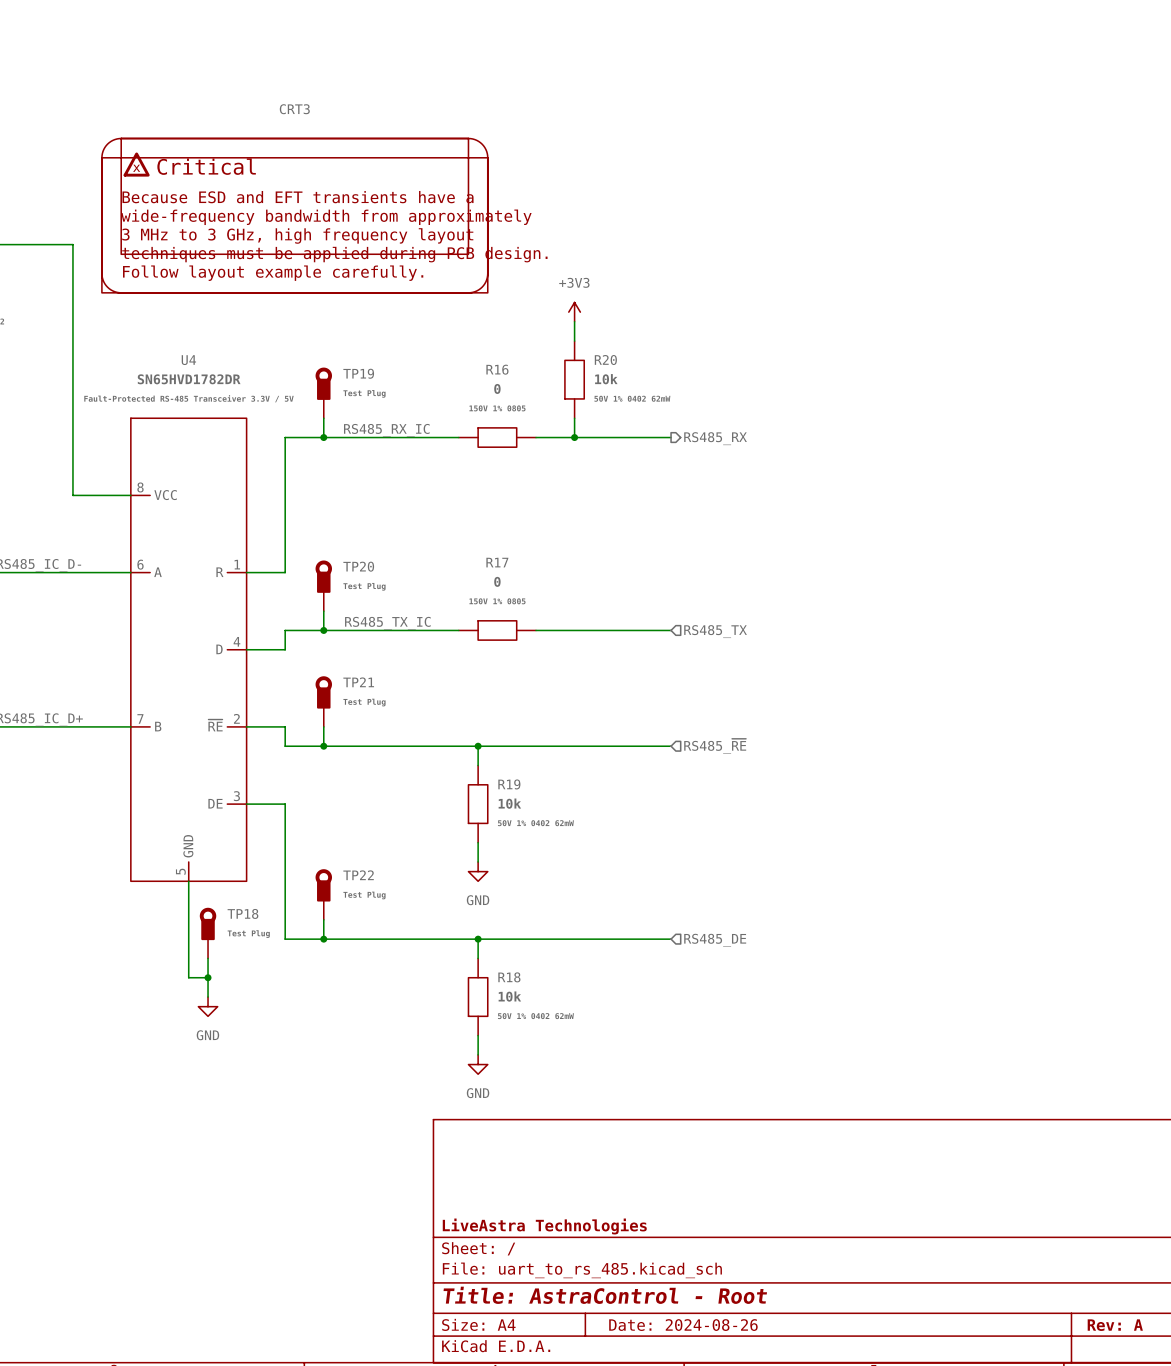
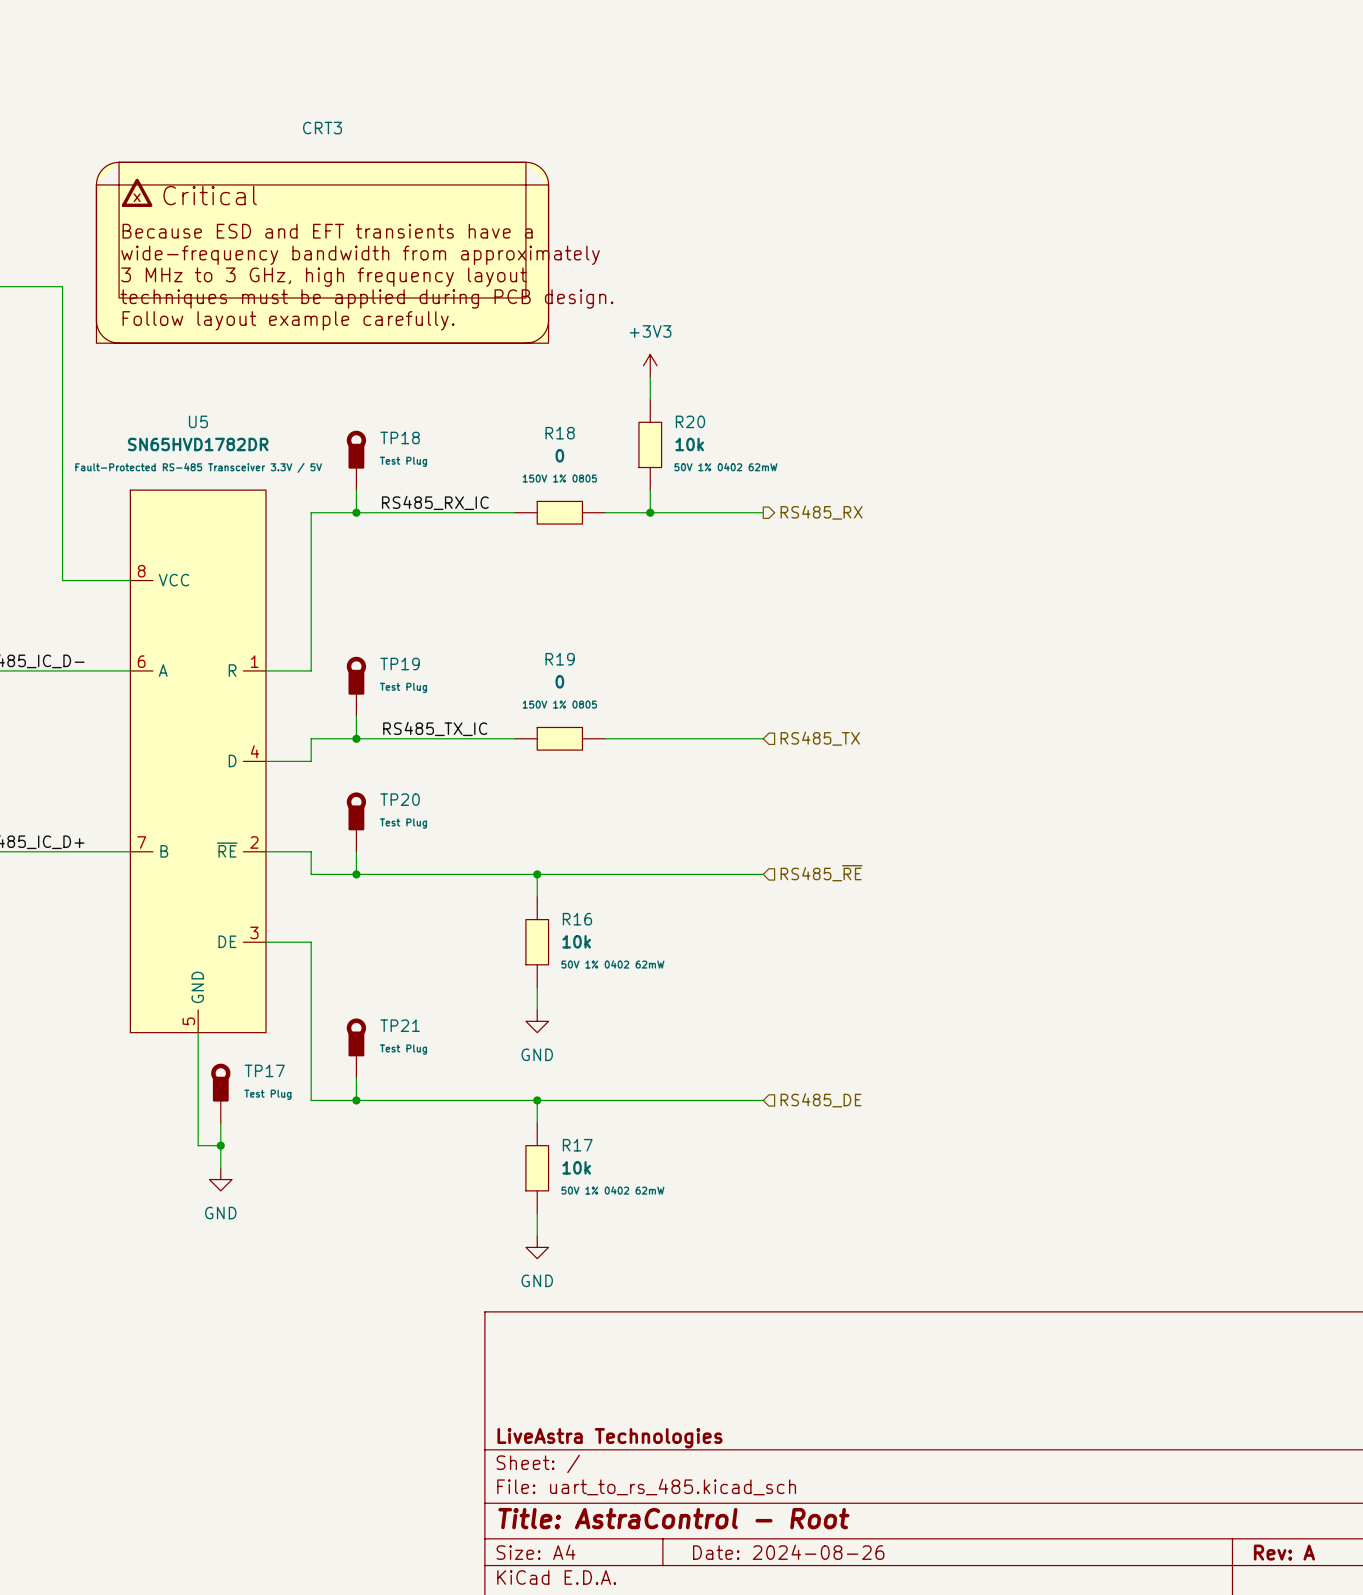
U4 name: U4 (188, 360) -> U5 (198, 421)
R16 name: R16 (497, 369) -> R18 (560, 433)
TP19 name: TP19 (358, 373) -> TP18 (400, 437)
R17 name: R17 (497, 562) -> R19 (560, 659)
TP20 name: TP20 (358, 566) -> TP19 (400, 664)
TP21 name: TP21 (358, 682) -> TP20 (400, 799)
R19 name: R19 (509, 784) -> R16 (577, 919)
TP22 name: TP22 (358, 875) -> TP21 (400, 1025)
TP18 name: TP18 (242, 913) -> TP17 (264, 1070)
R18 name: R18 (509, 977) -> R17 (577, 1145)

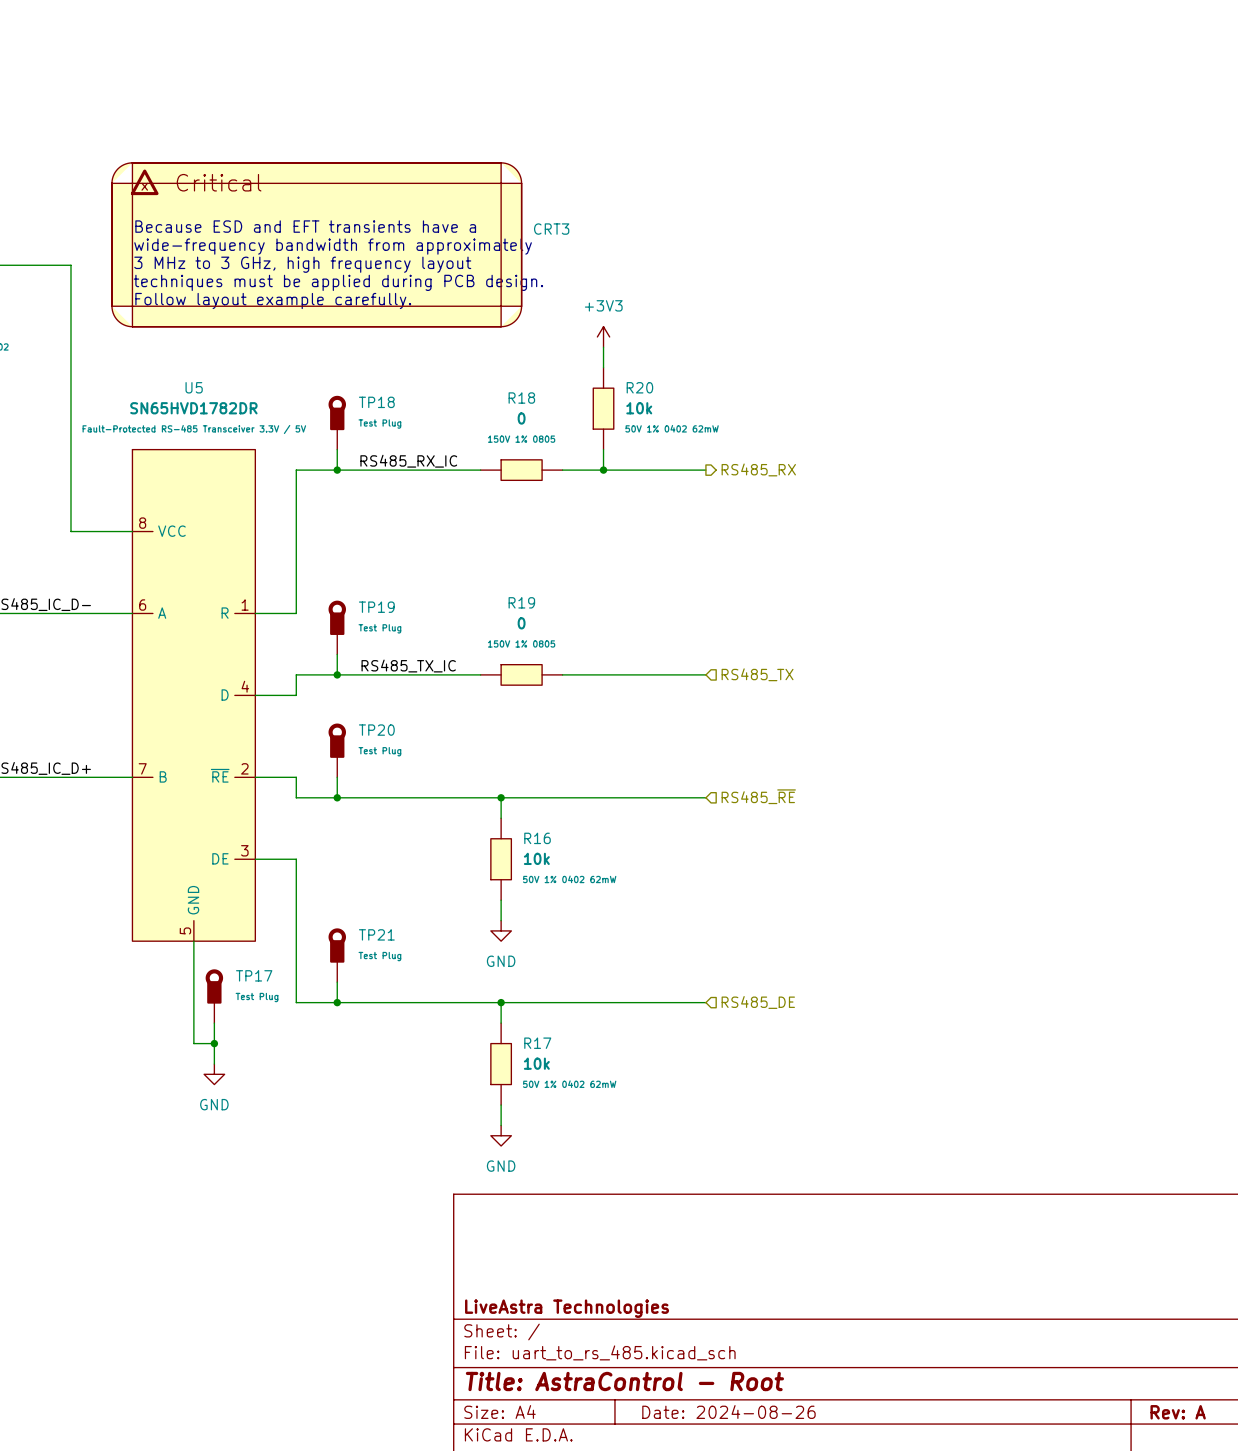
CRT3 name position: CRT3 (322, 128) -> CRT3 (551, 229)
CRT3 symbol: [96, 162, 549, 344] -> [111, 162, 522, 327]
text: none -> Because ESD and EFT transients have a (305, 226)
text: none -> wide-frequency bandwidth from approximately (333, 246)
text: none -> 3 MHz to 3 GHz, high frequency layout (302, 264)
text: none -> techniques must be applied during PCB design. (338, 282)
text: none -> Follow layout example carefully. (273, 300)

